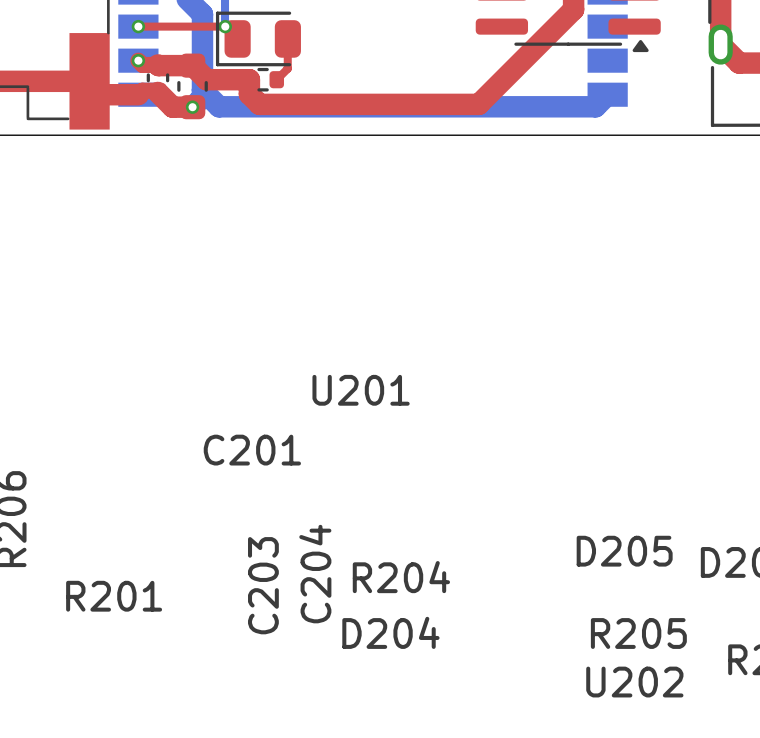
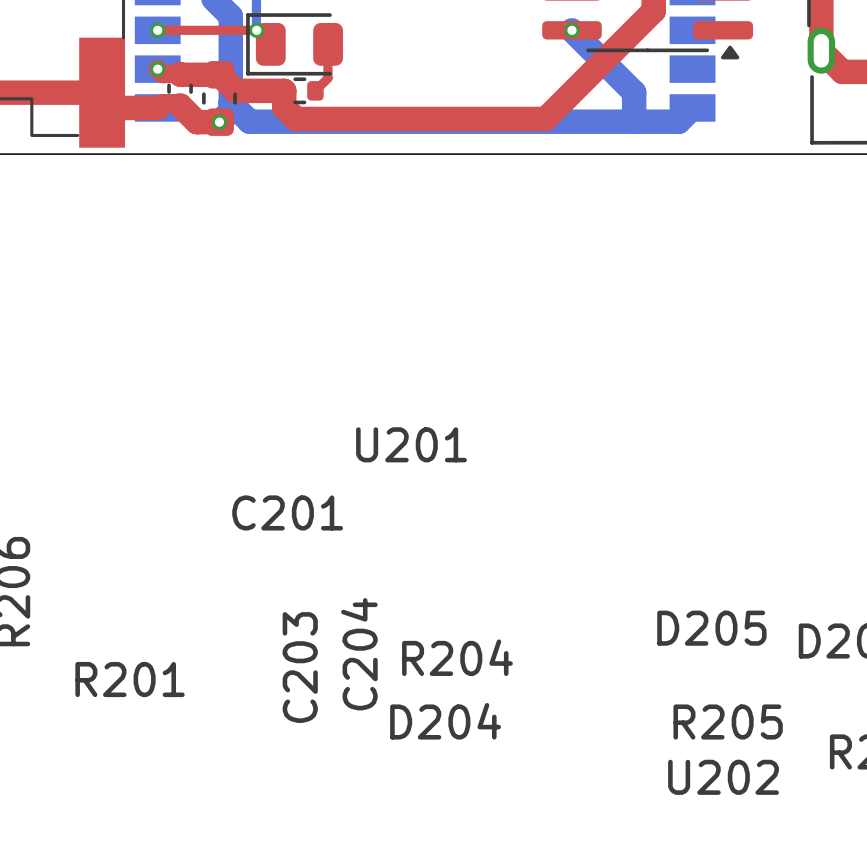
bottom track: none -> (571, 30) (634, 92) (634, 121)
via: none -> (571, 30)

